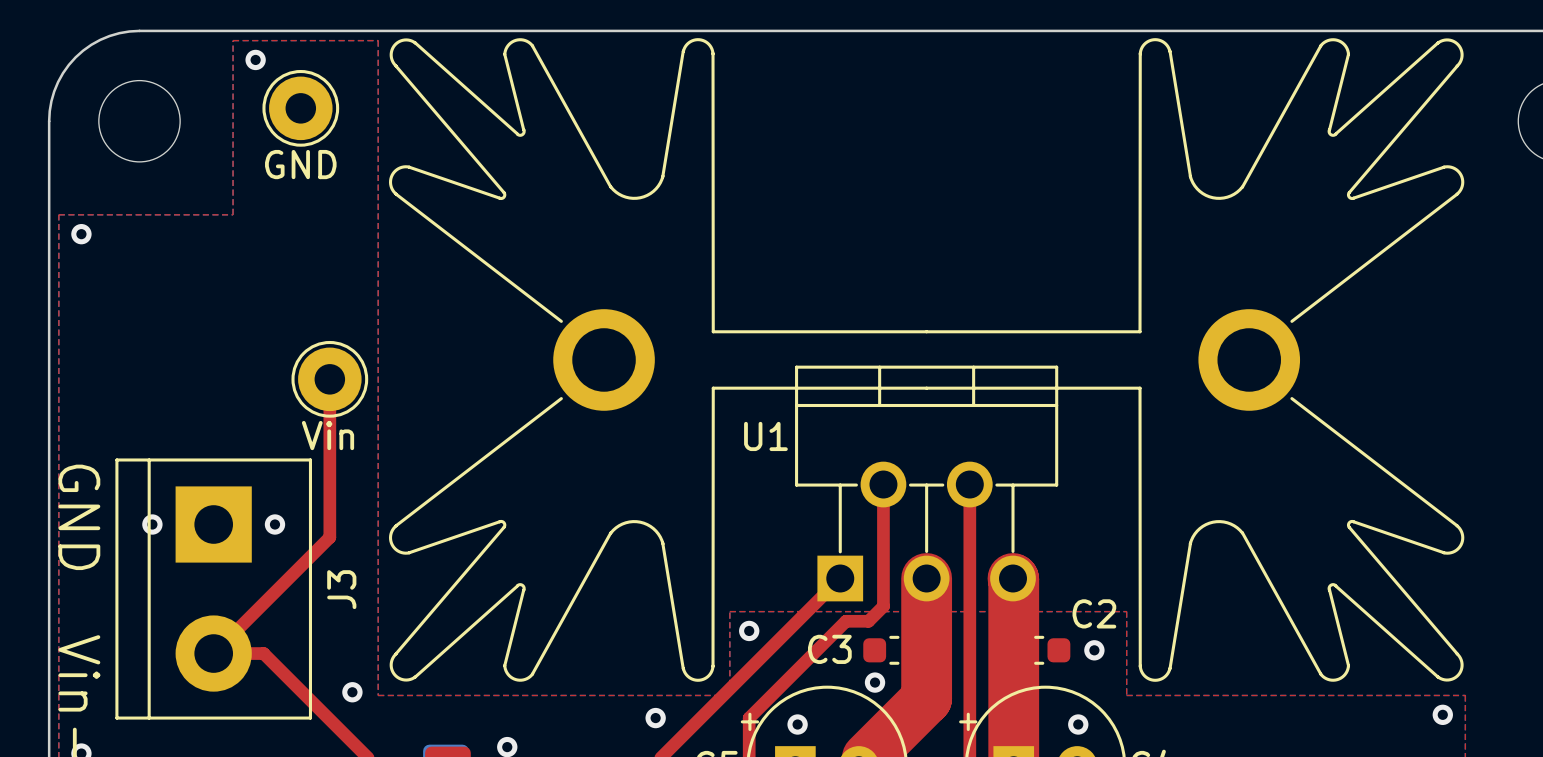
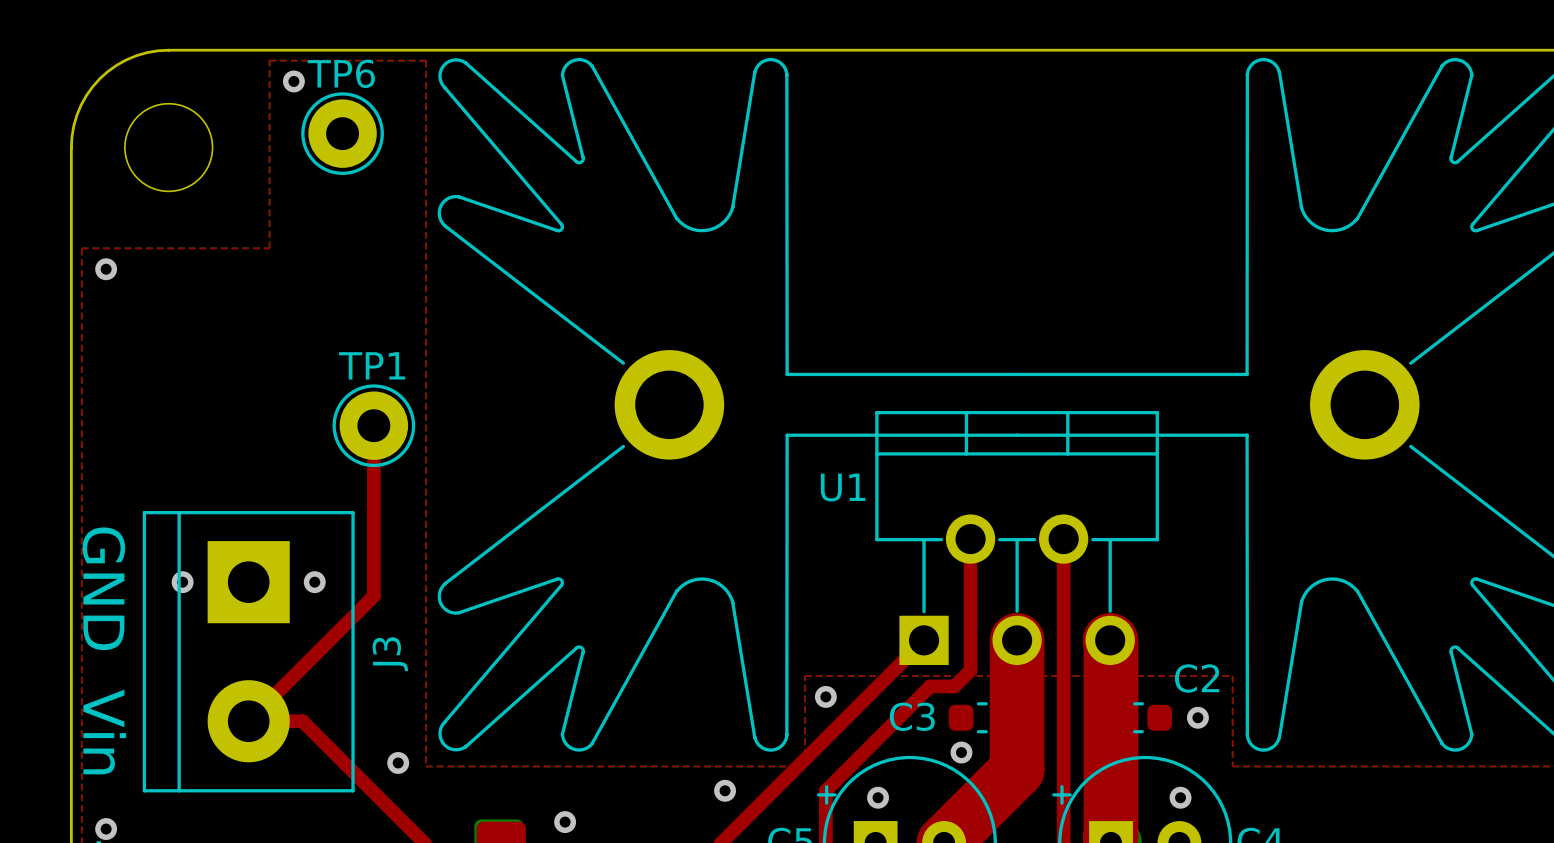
TP6 name: none -> TP6 (341, 73)
TP6 value: GND (300, 164) -> none
TP1 name: none -> TP1 (372, 365)
TP1 value: Vin (328, 435) -> none

